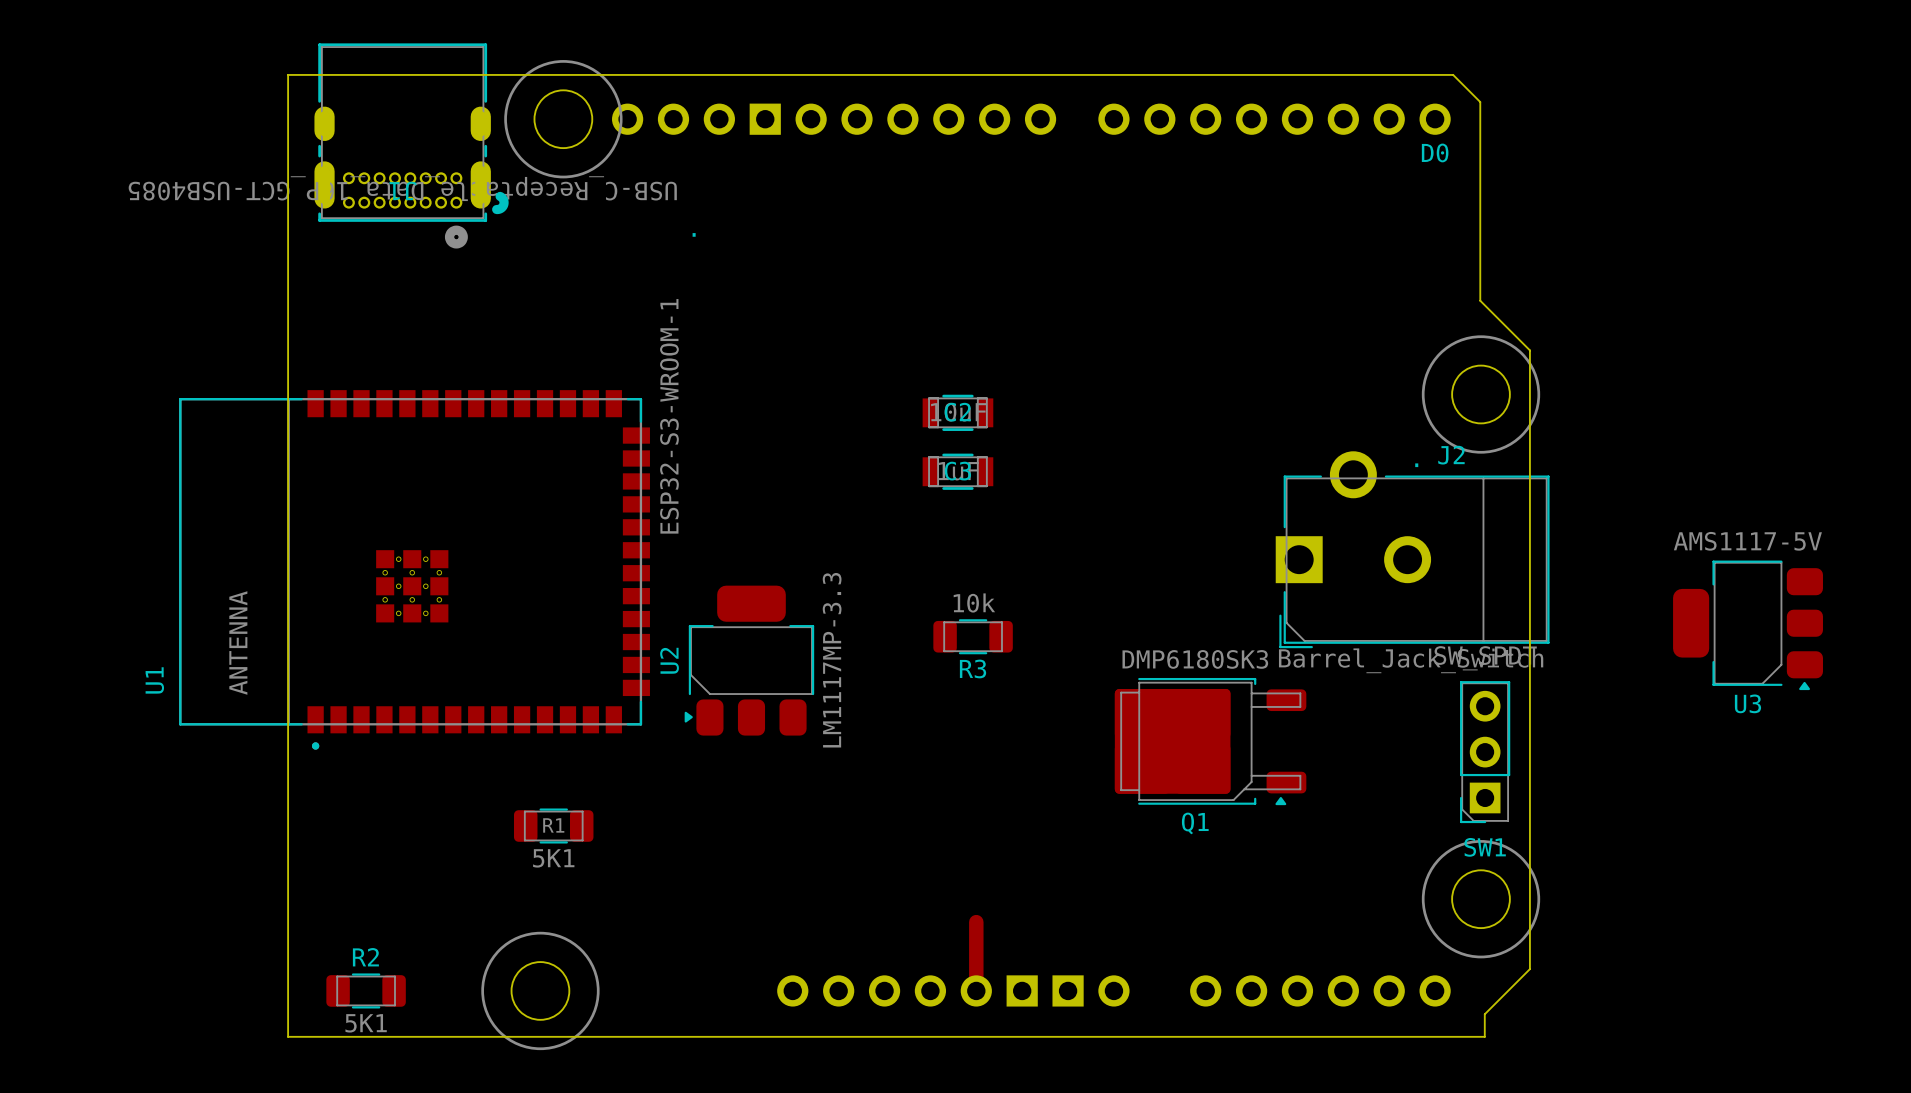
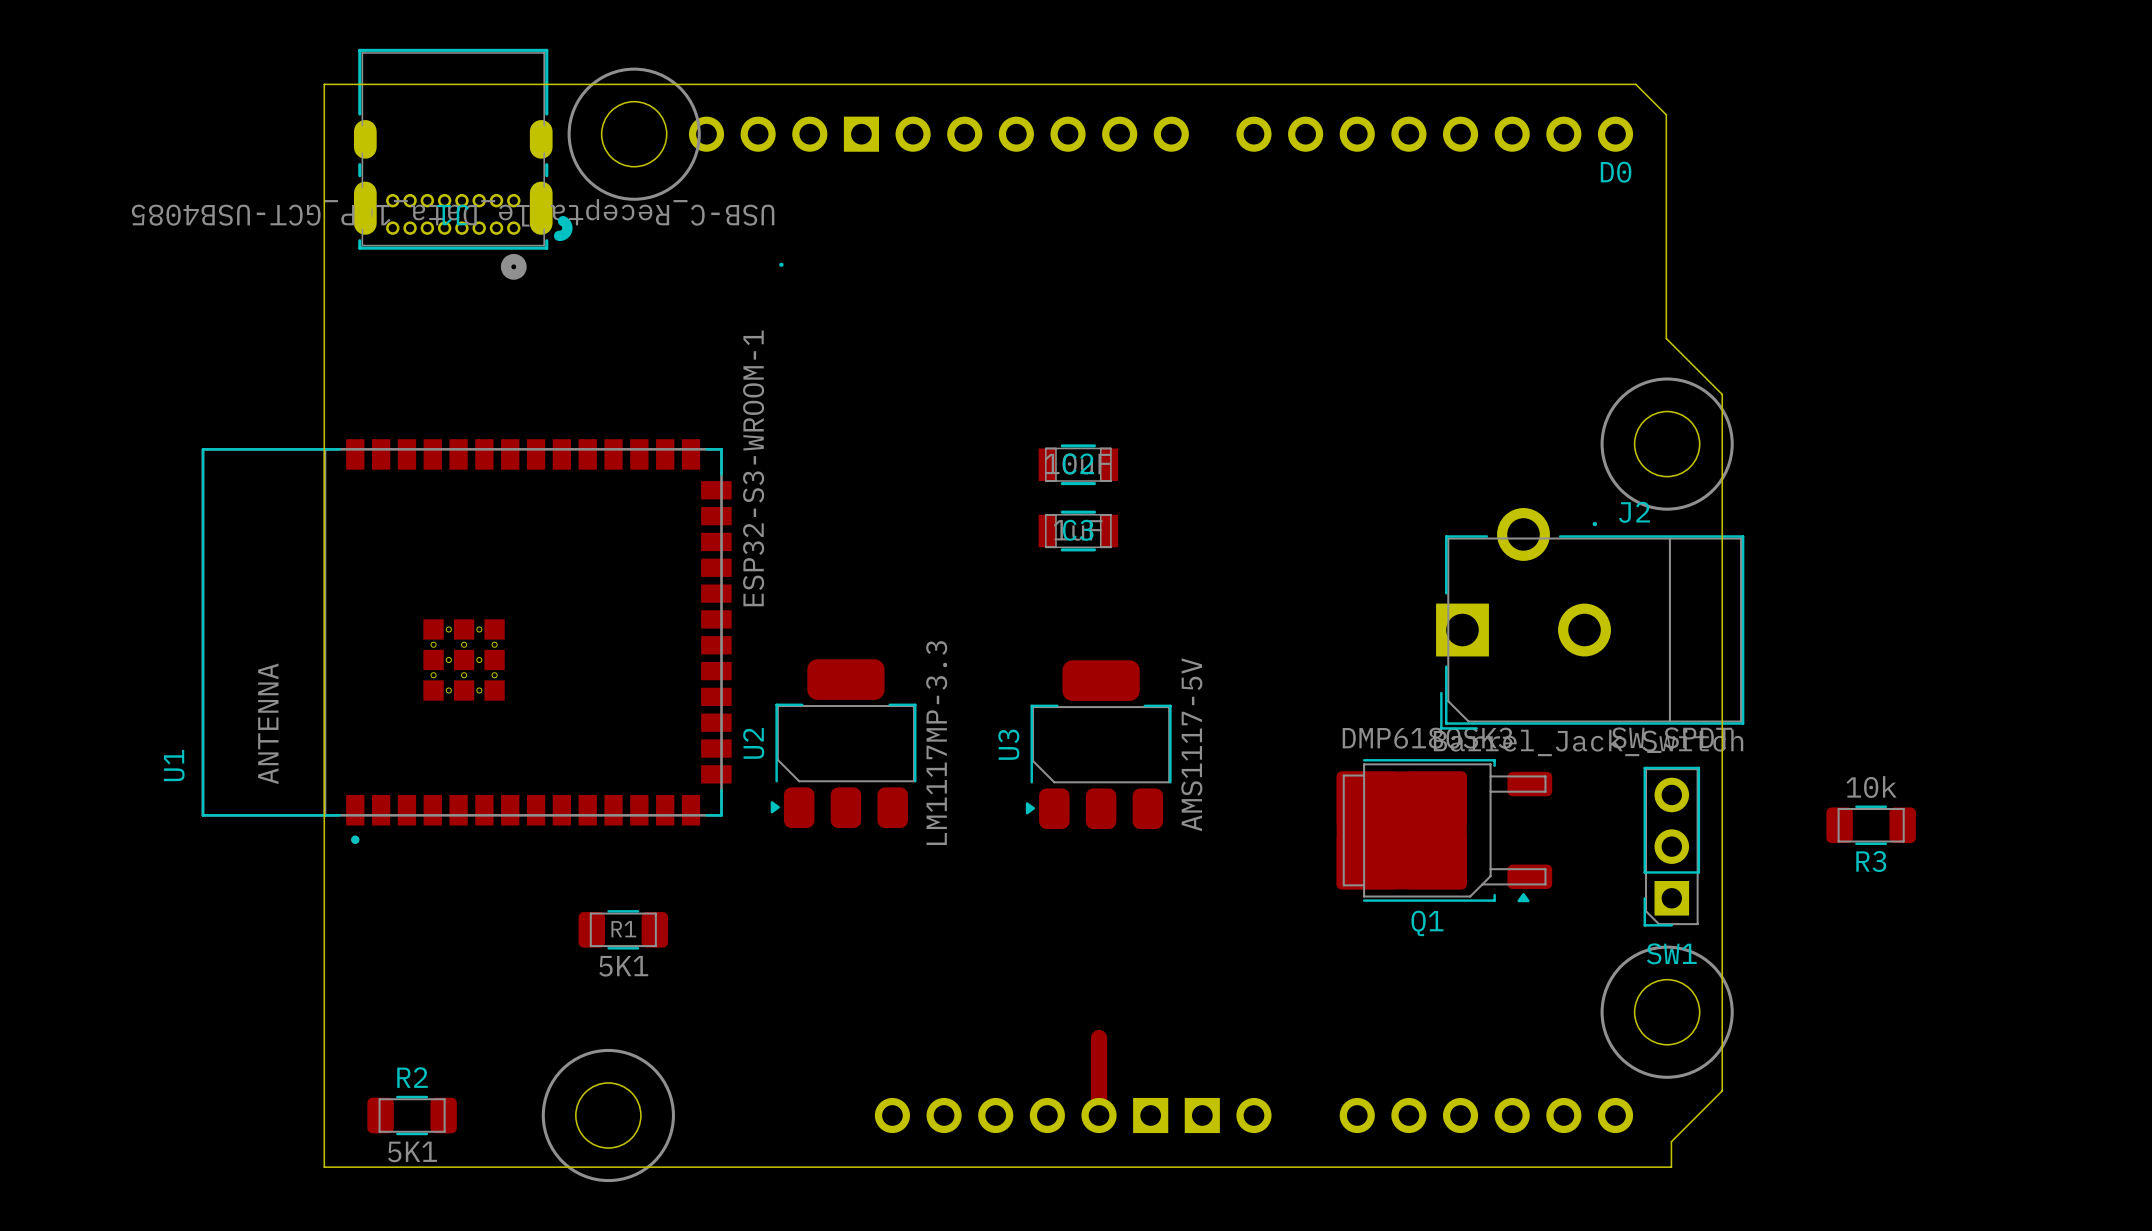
U3 rotation: 0° (1748, 625) -> 90° clockwise (1098, 744)
U3 position: (1748, 625) -> (1098, 744)
R3 position: (973, 636) -> (1871, 825)
Q1 position: (1210, 741) -> (1444, 830)

